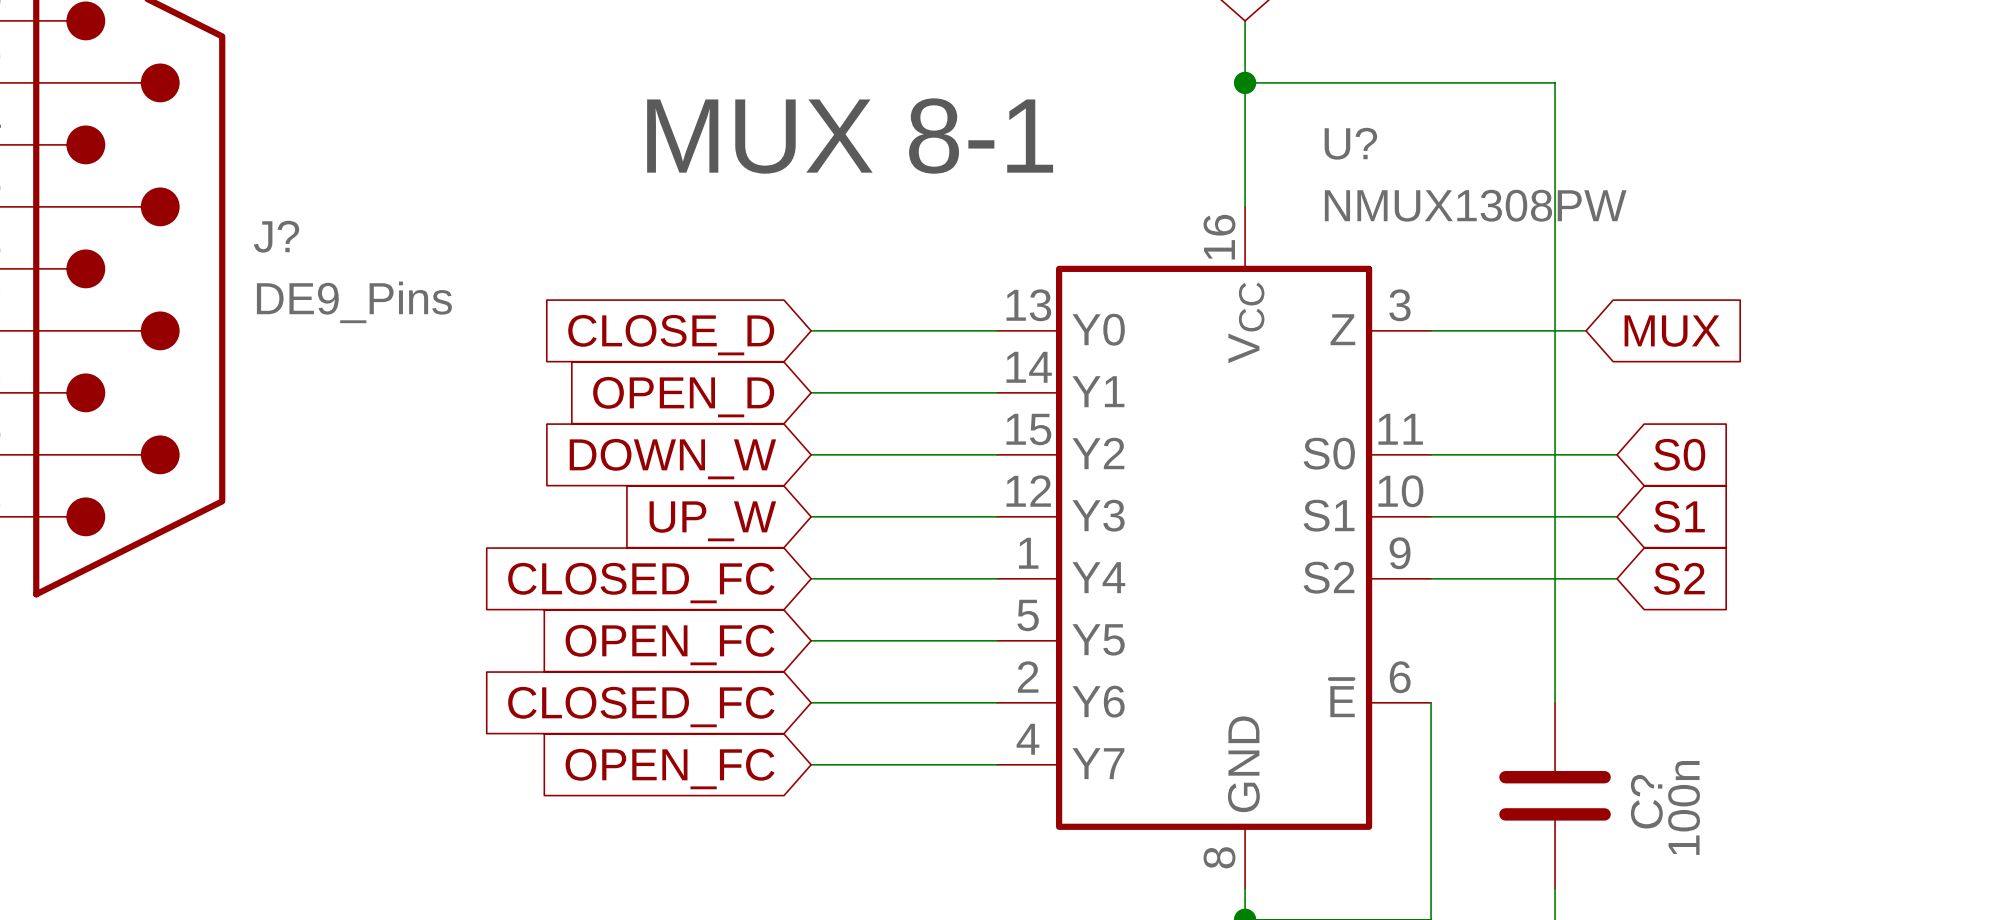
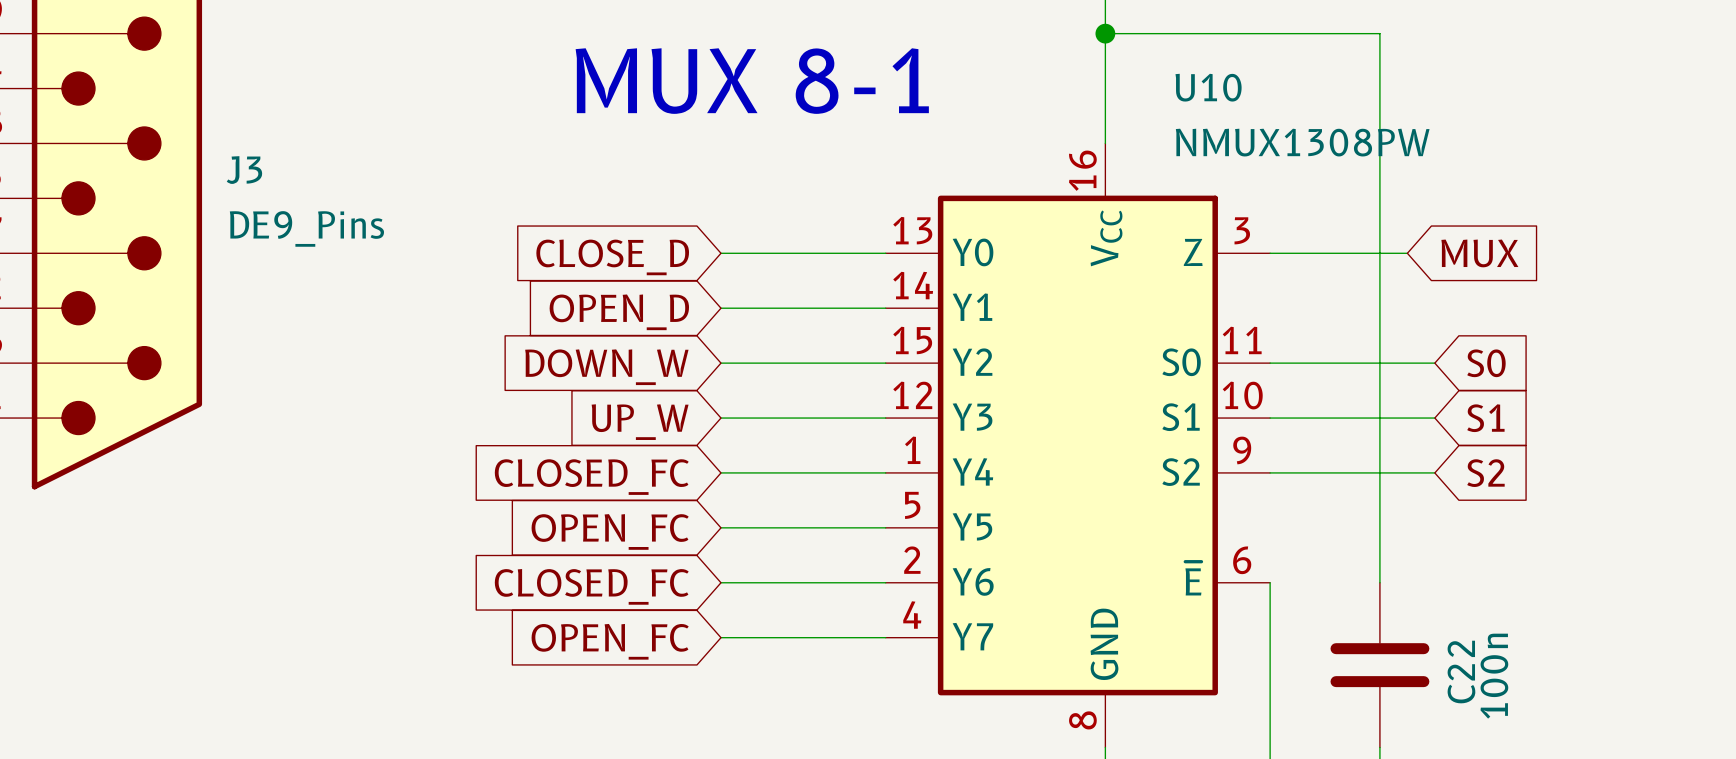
U? name: U? (1350, 143) -> U10 (1208, 87)
J? name: J? (276, 236) -> J3 (244, 170)
C? name: C? (1646, 801) -> C22 (1461, 672)

